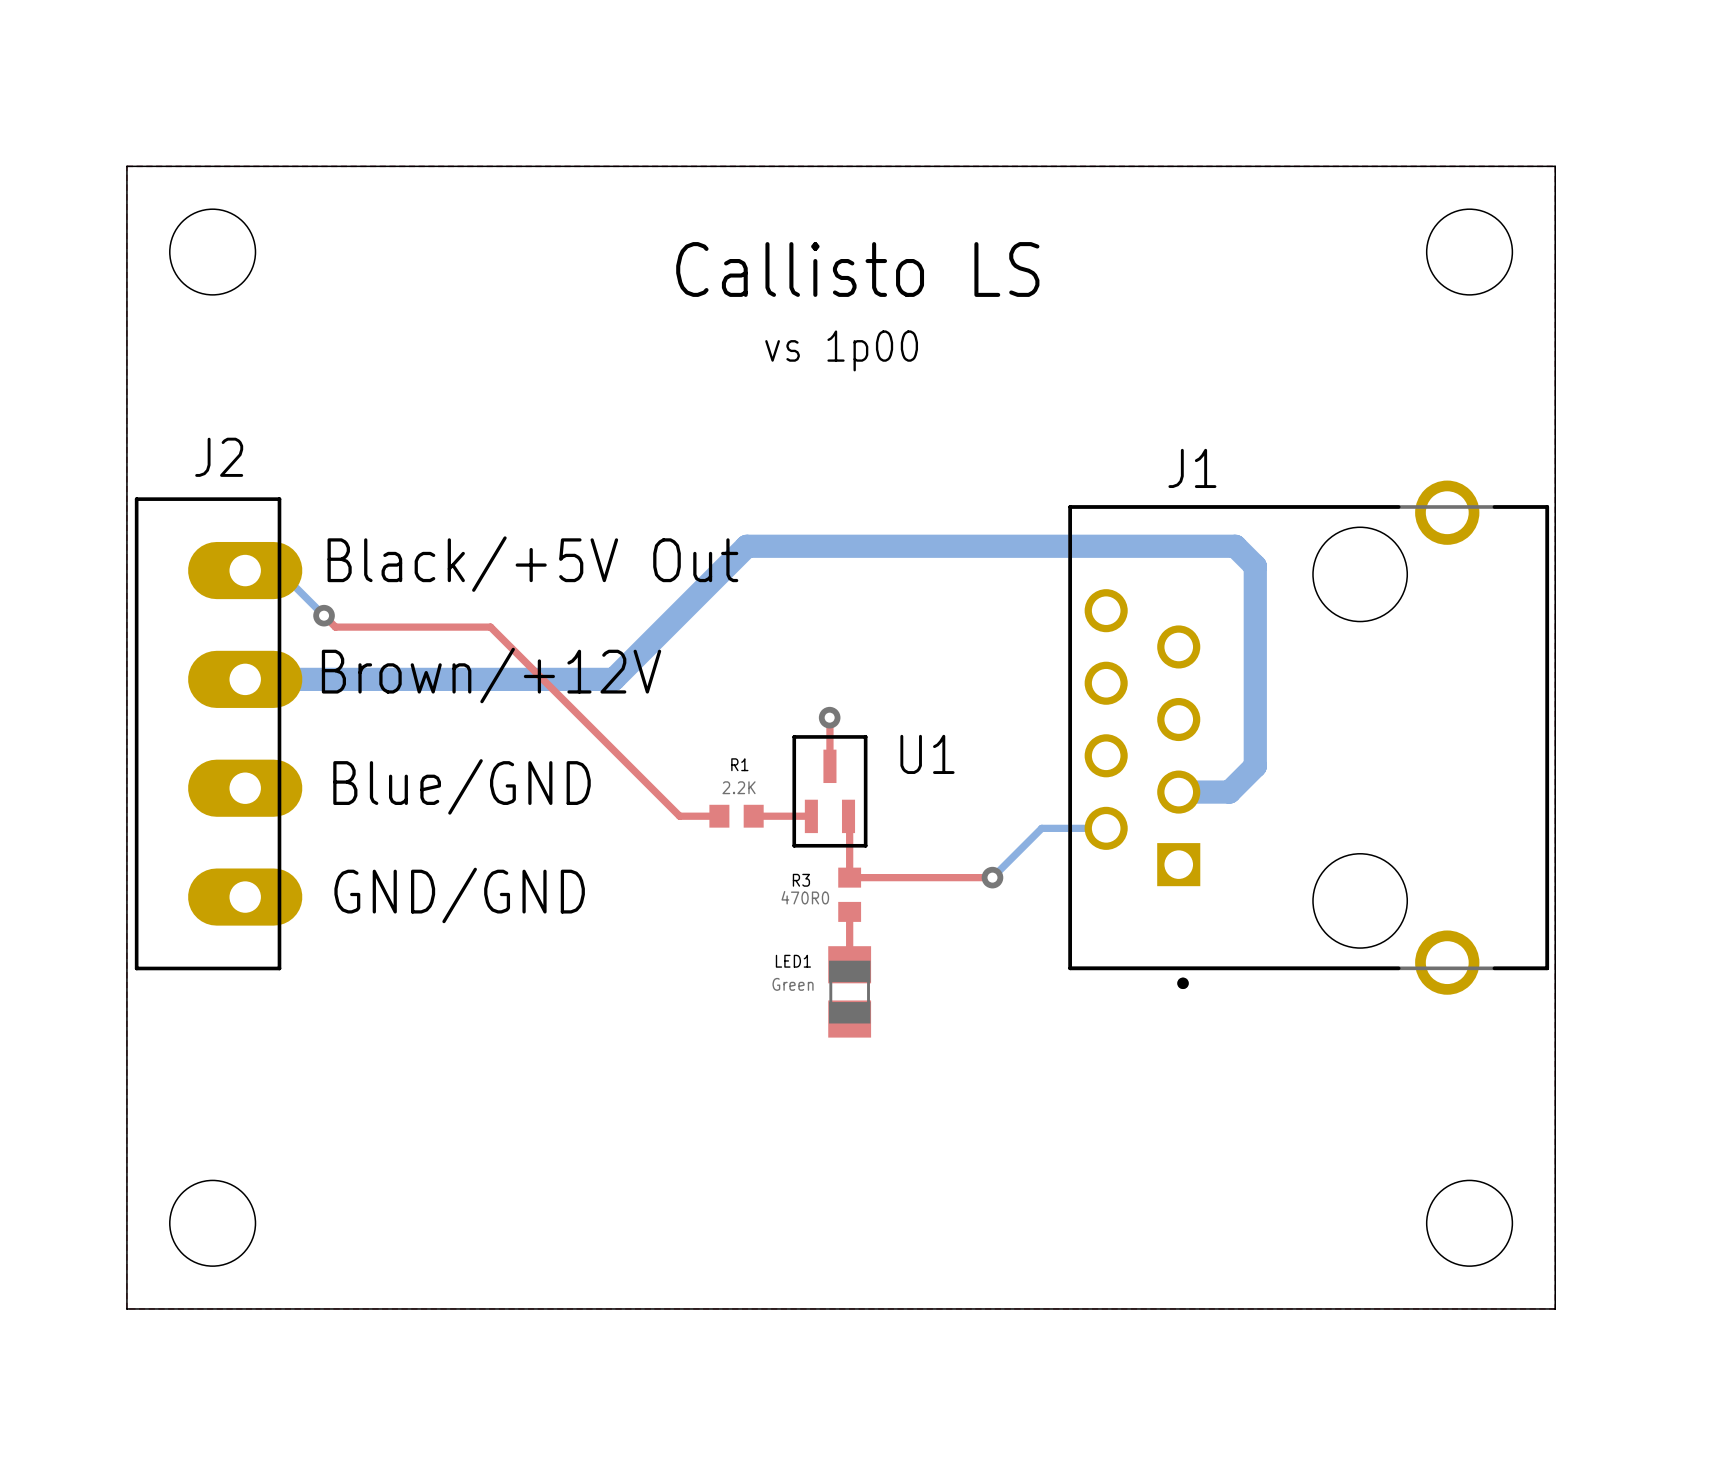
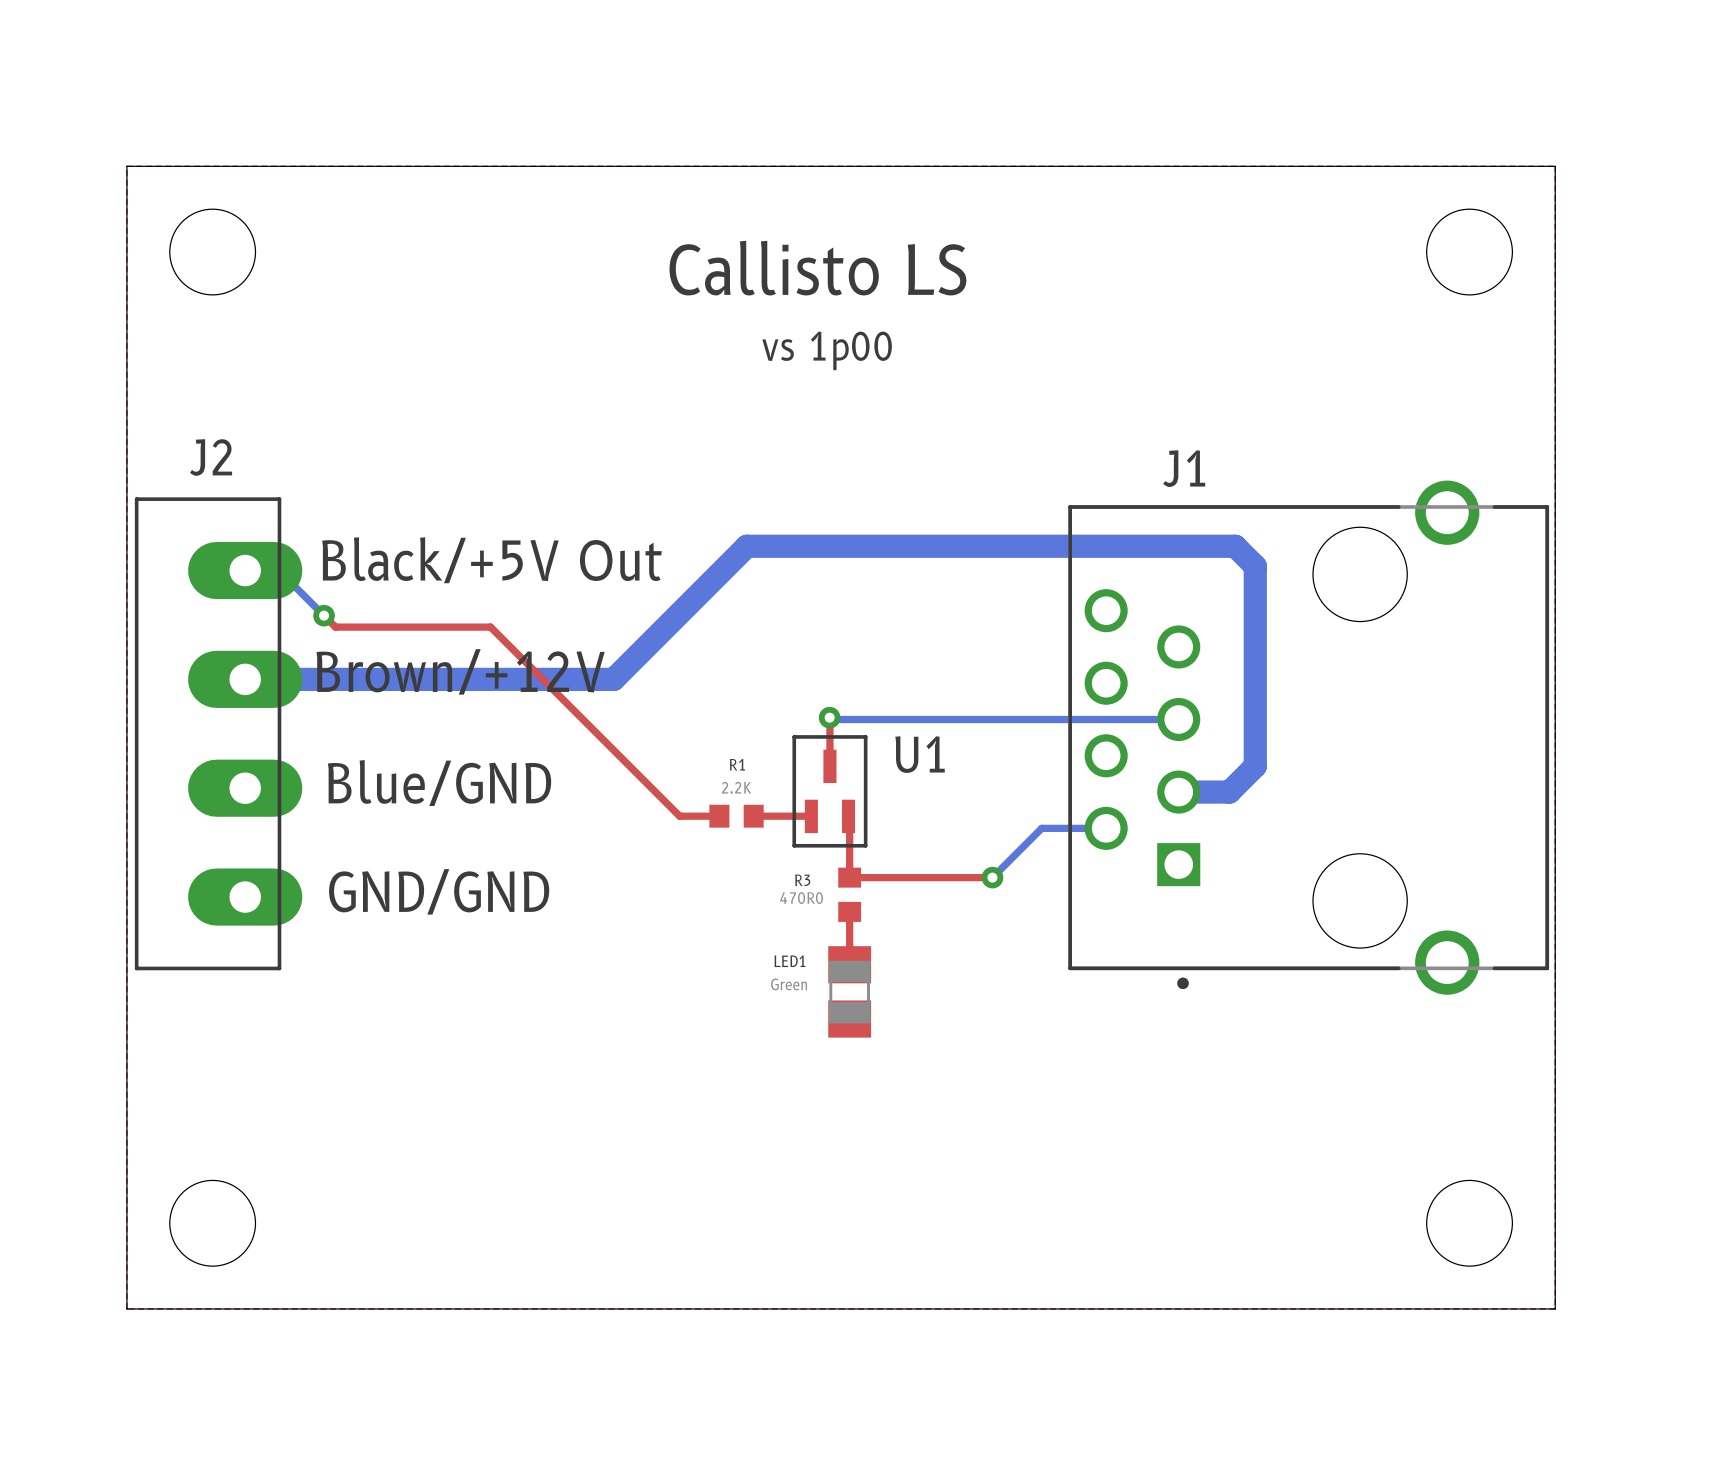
bottom track: none -> (831, 719) (1178, 719)

